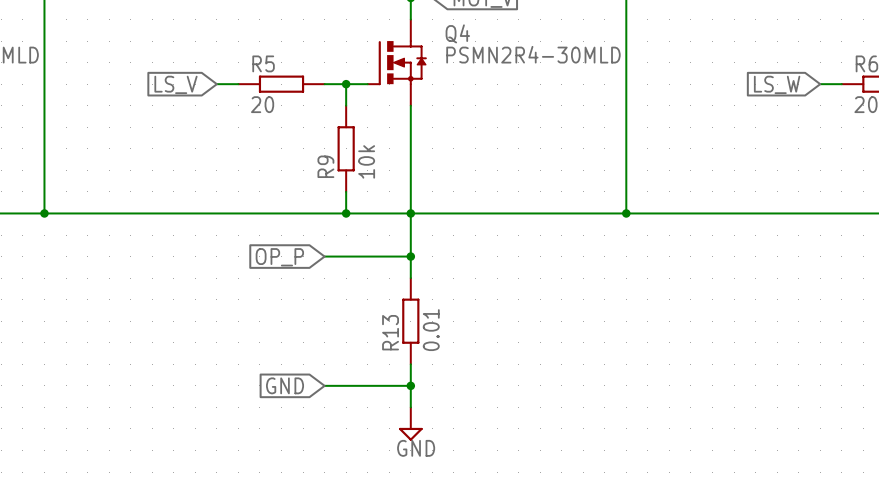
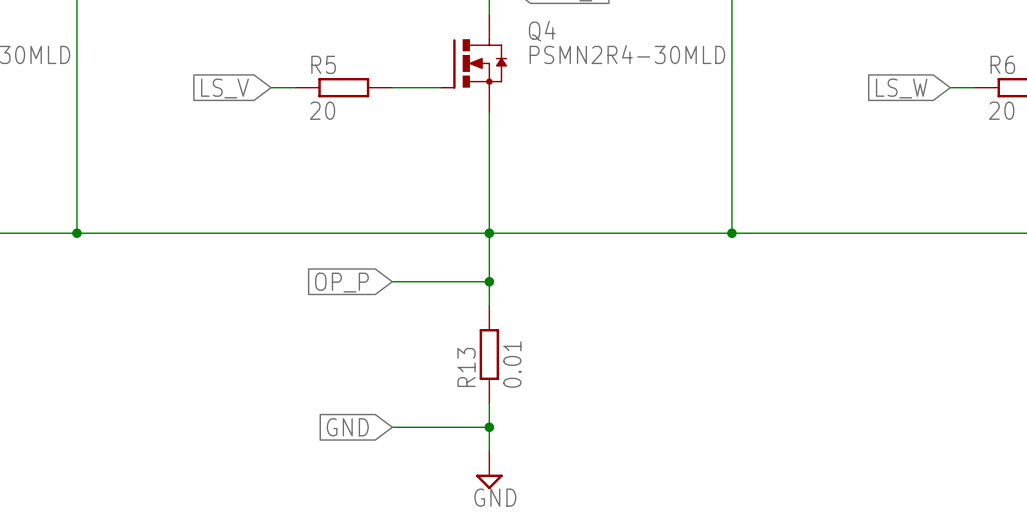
wire: (346, 84) (346, 105) -> none
junction: (346, 84) -> none
R9: 10k (346, 148) -> none
wire: (346, 191) (346, 213) -> none
junction: (346, 213) -> none

